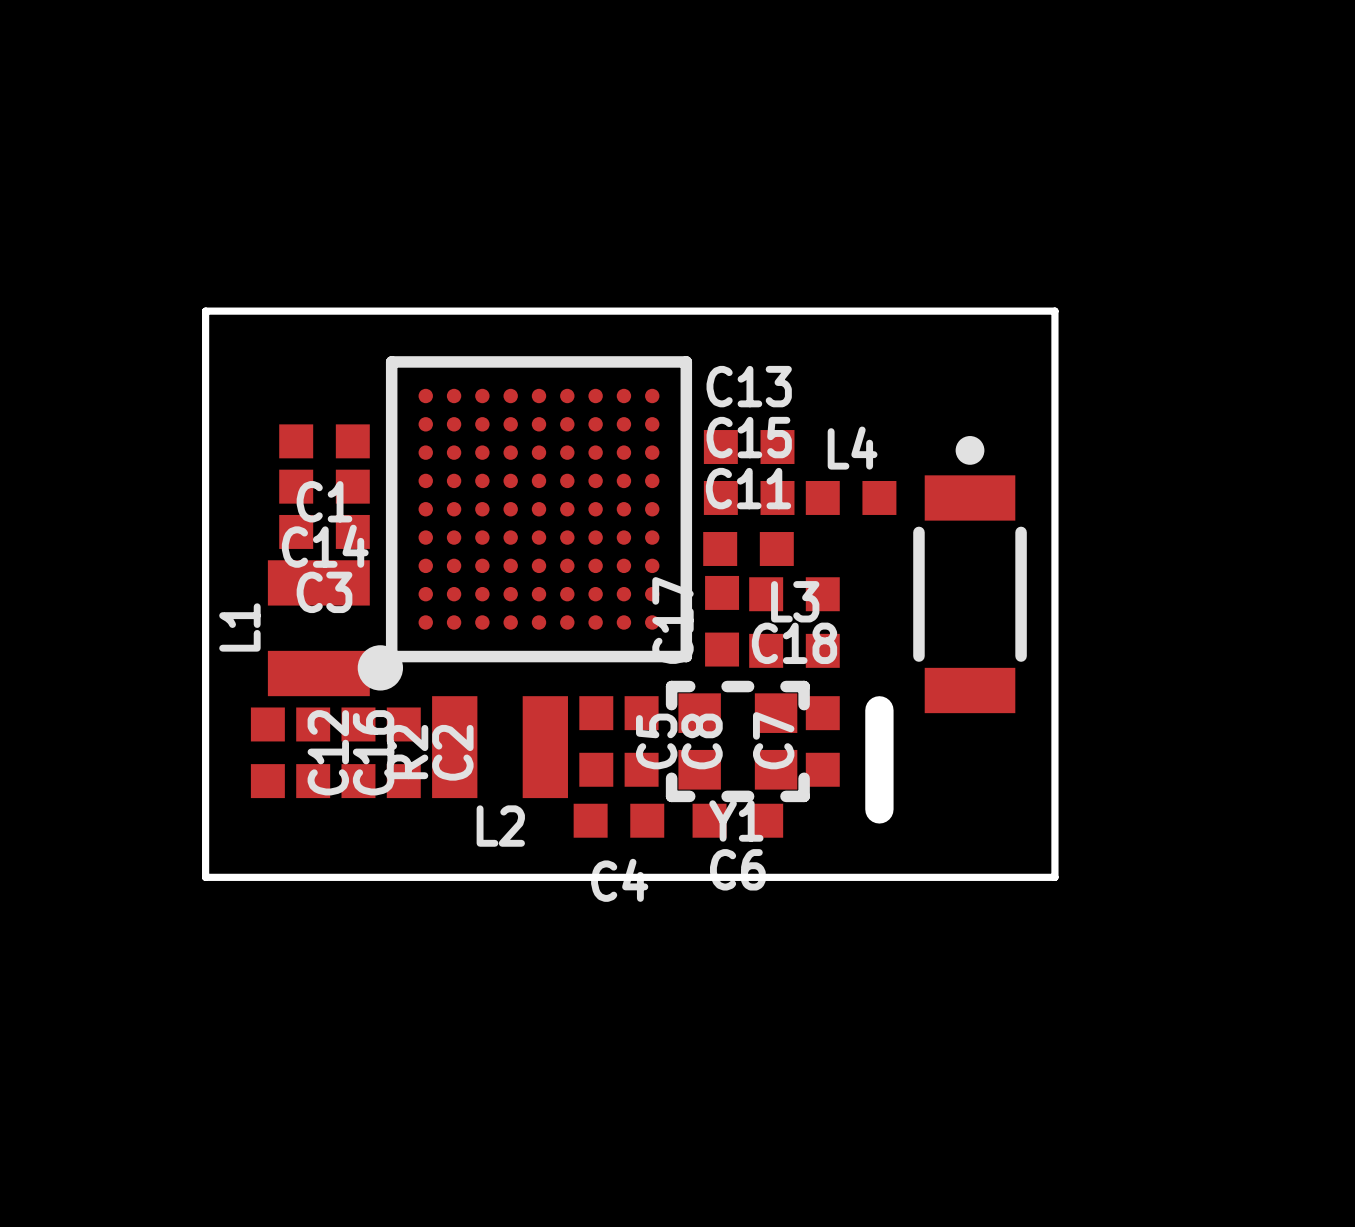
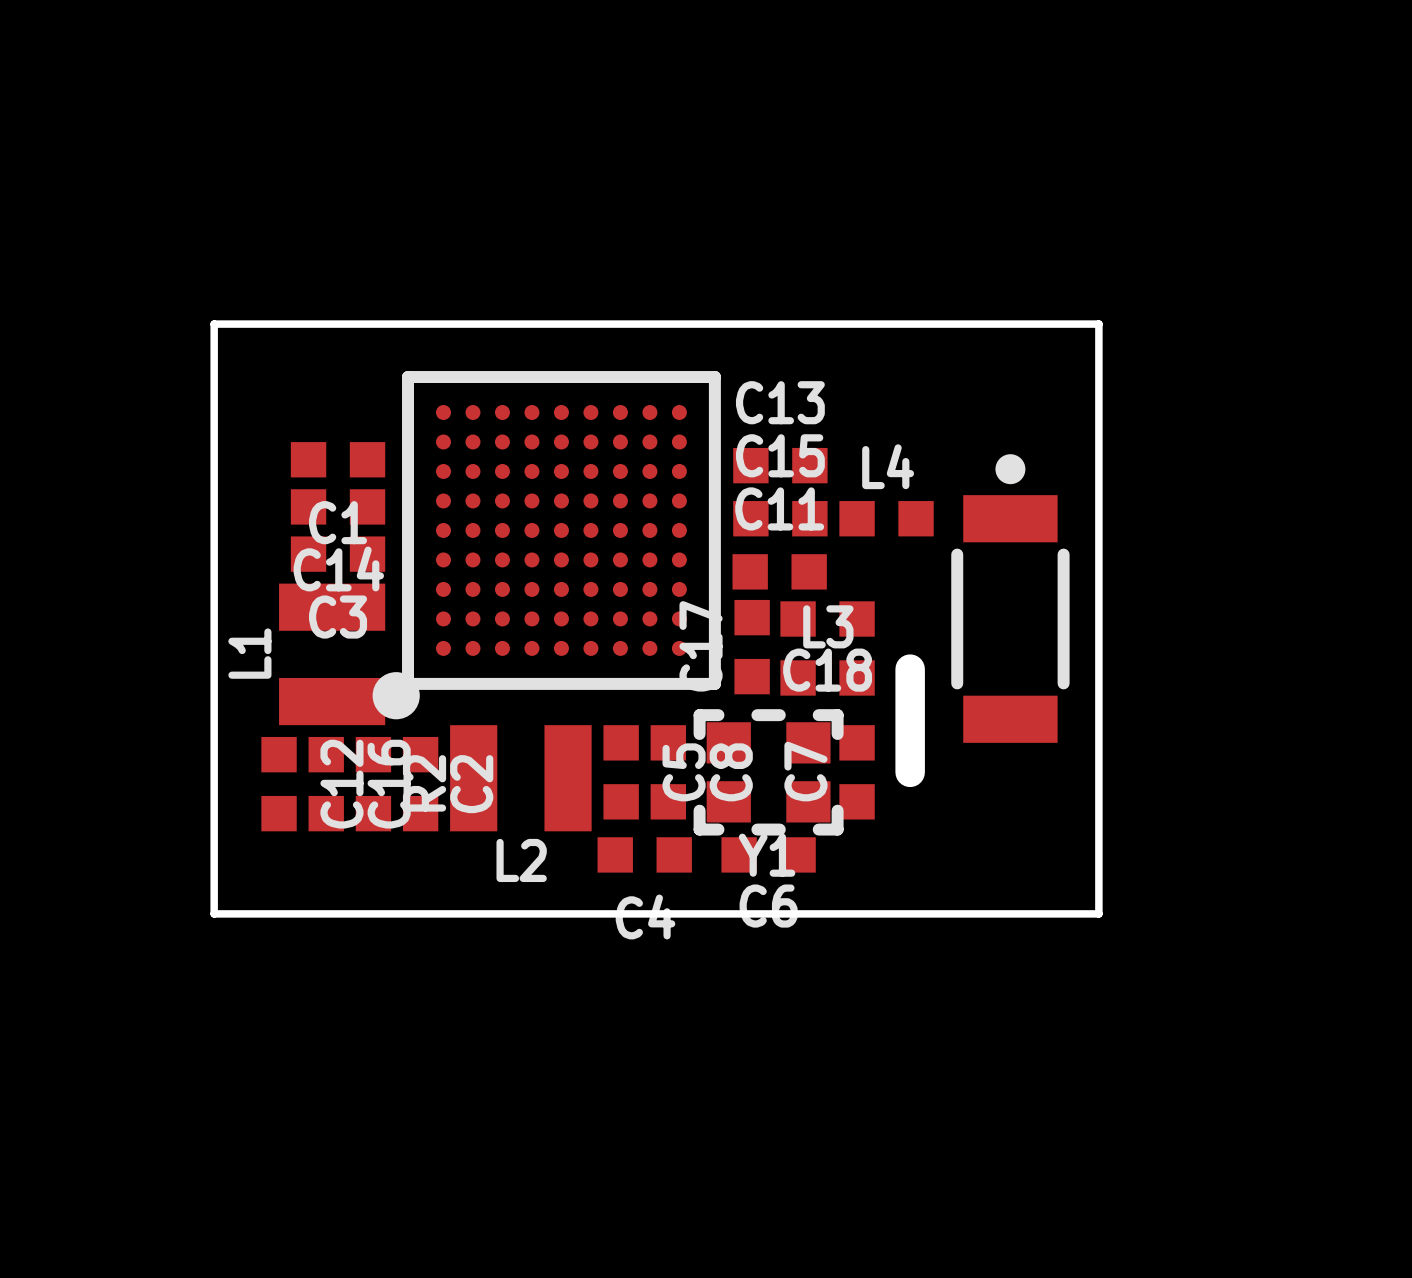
board edge: (879, 710) (879, 809) -> (910, 669) (910, 772)

